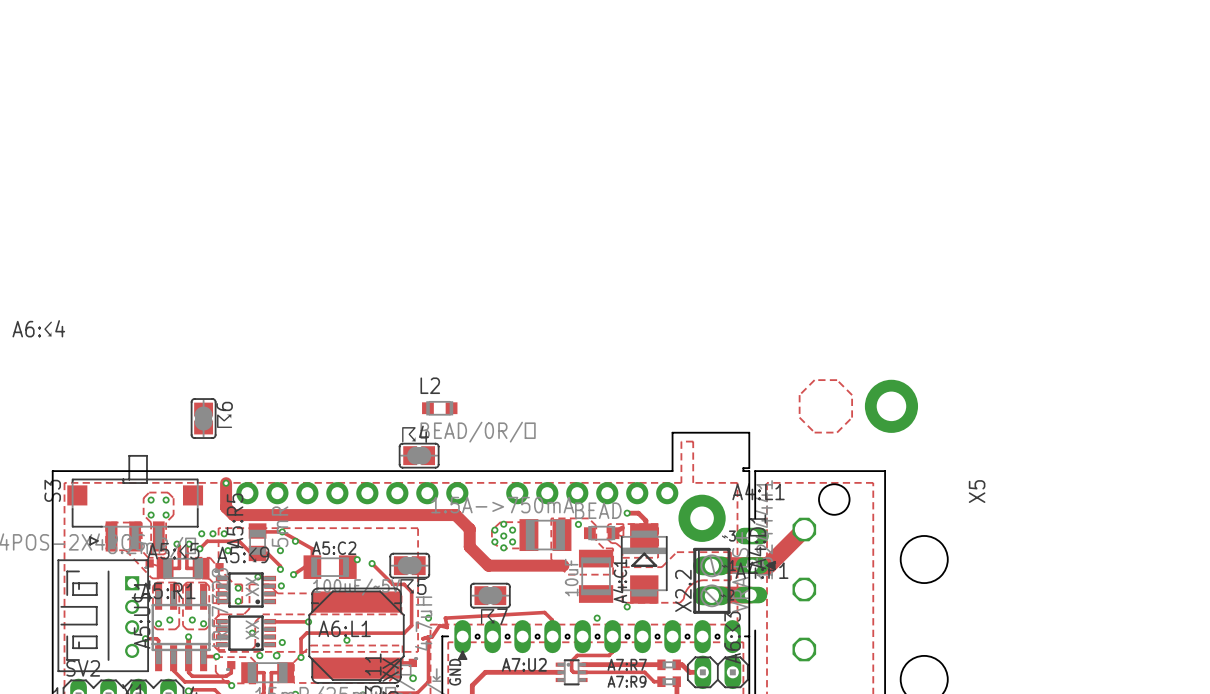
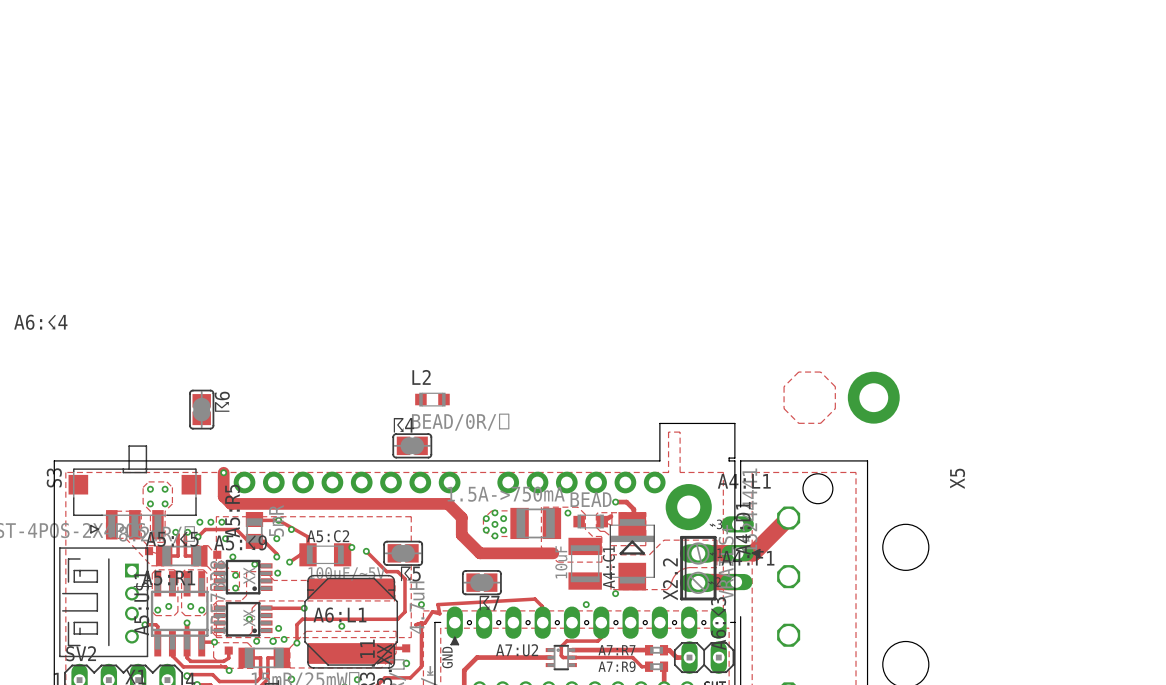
via: none -> (232, 557)
via: none -> (284, 639)

